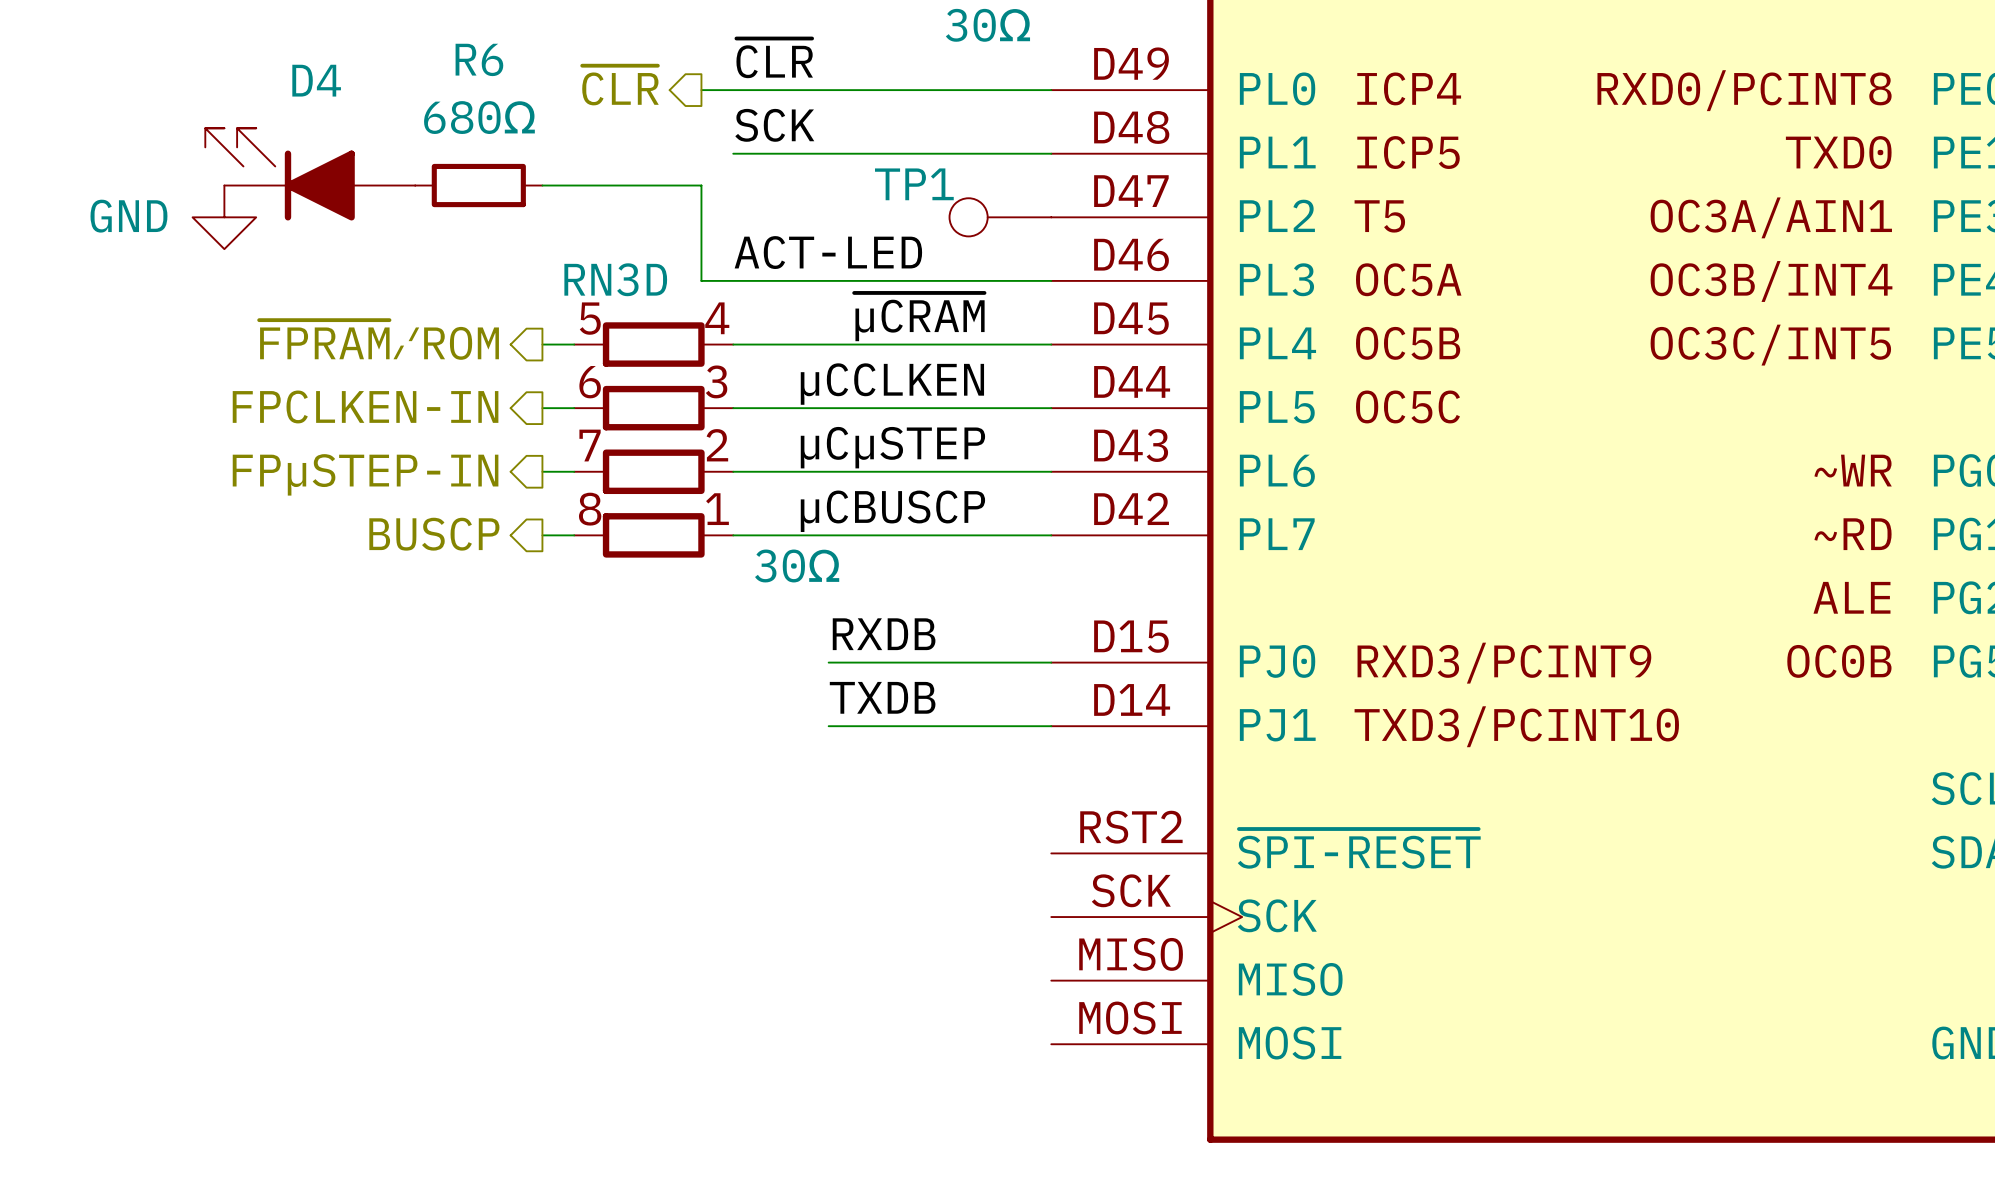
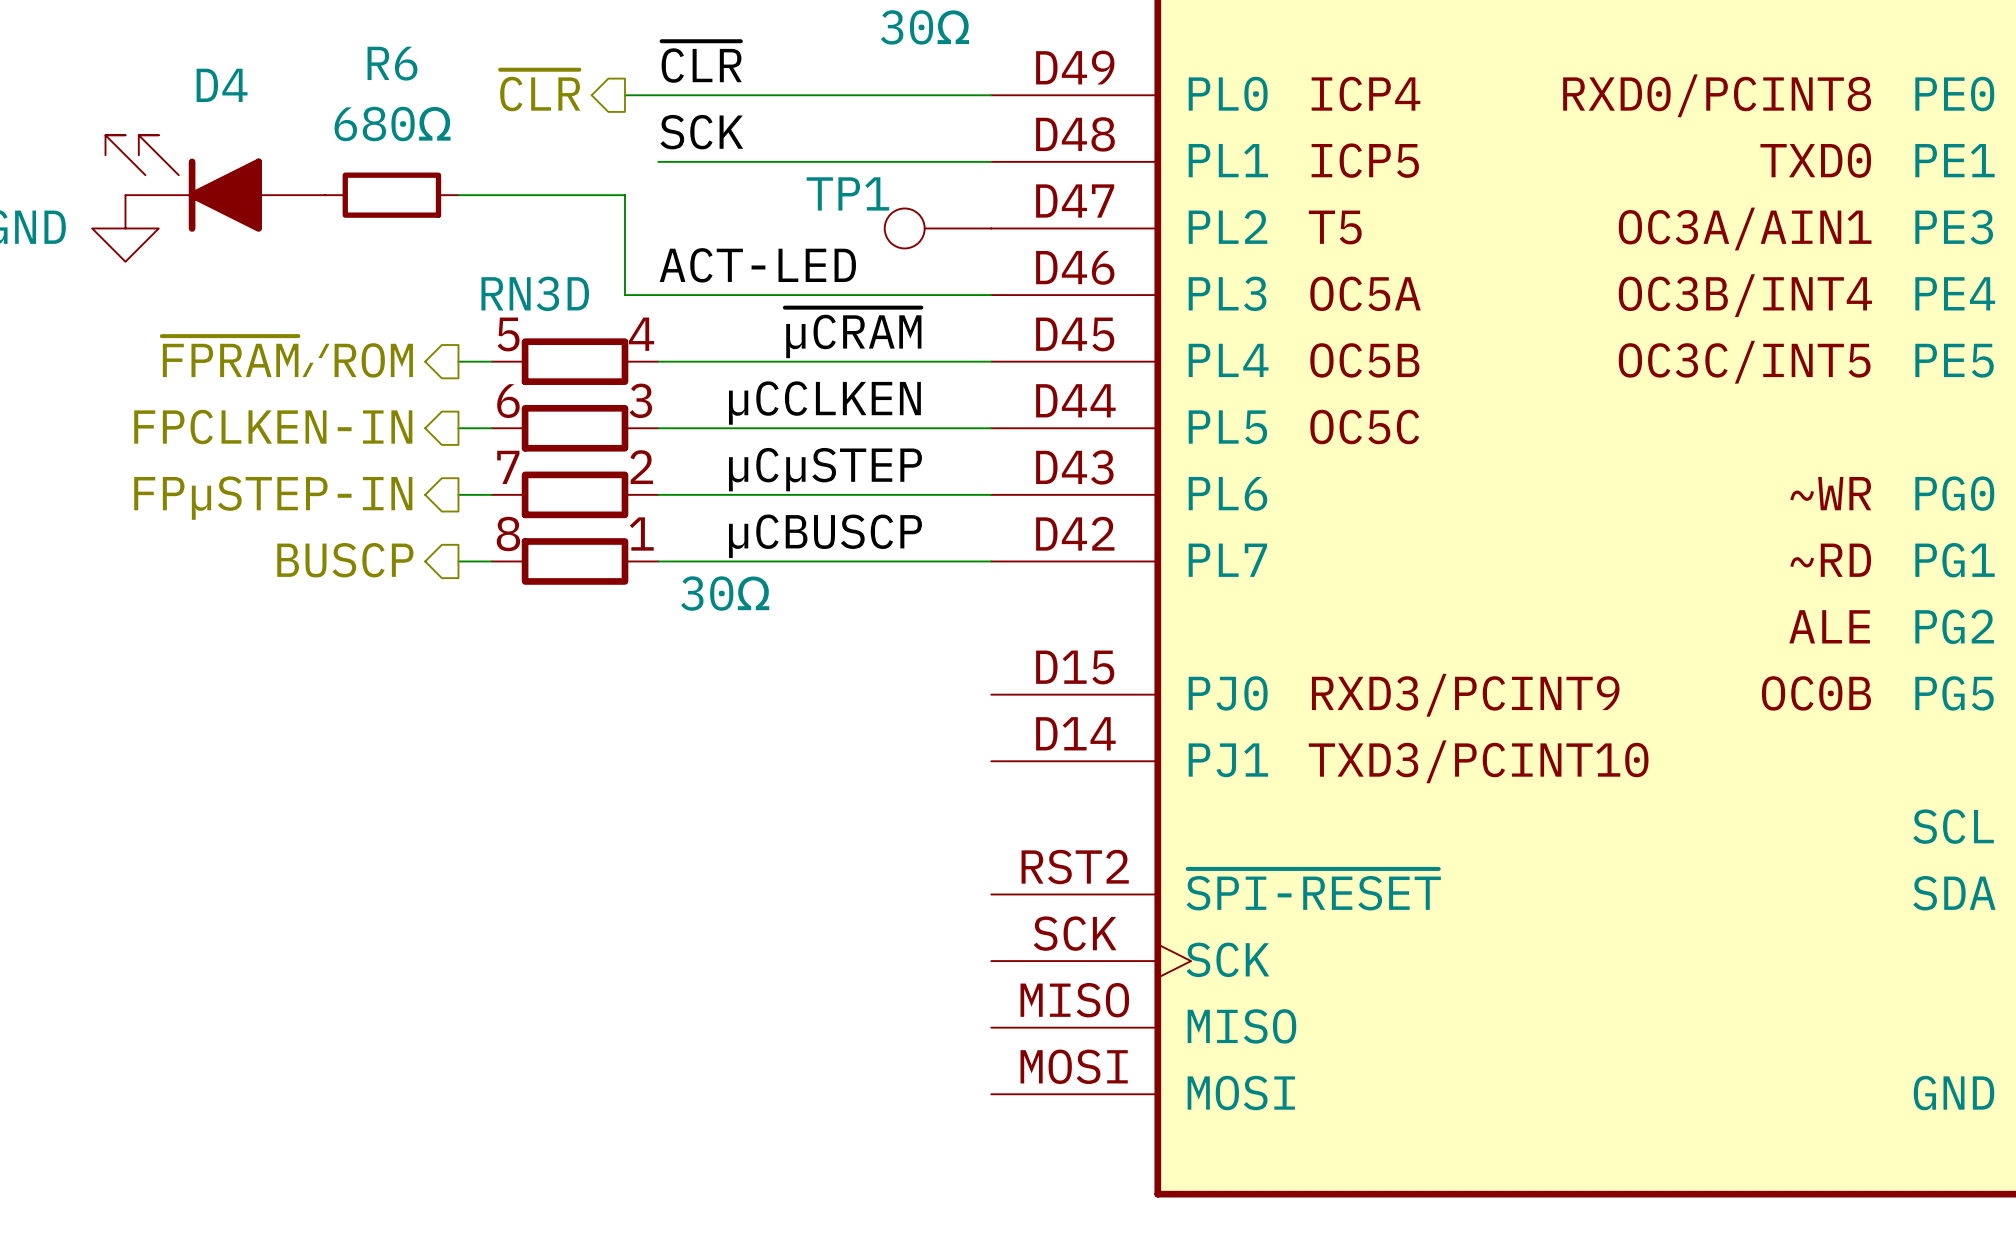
label: RXDB (884, 634) -> none
wire: (828, 662) (1051, 662) -> none
label: TXDB (882, 697) -> none
wire: (828, 726) (1051, 726) -> none

